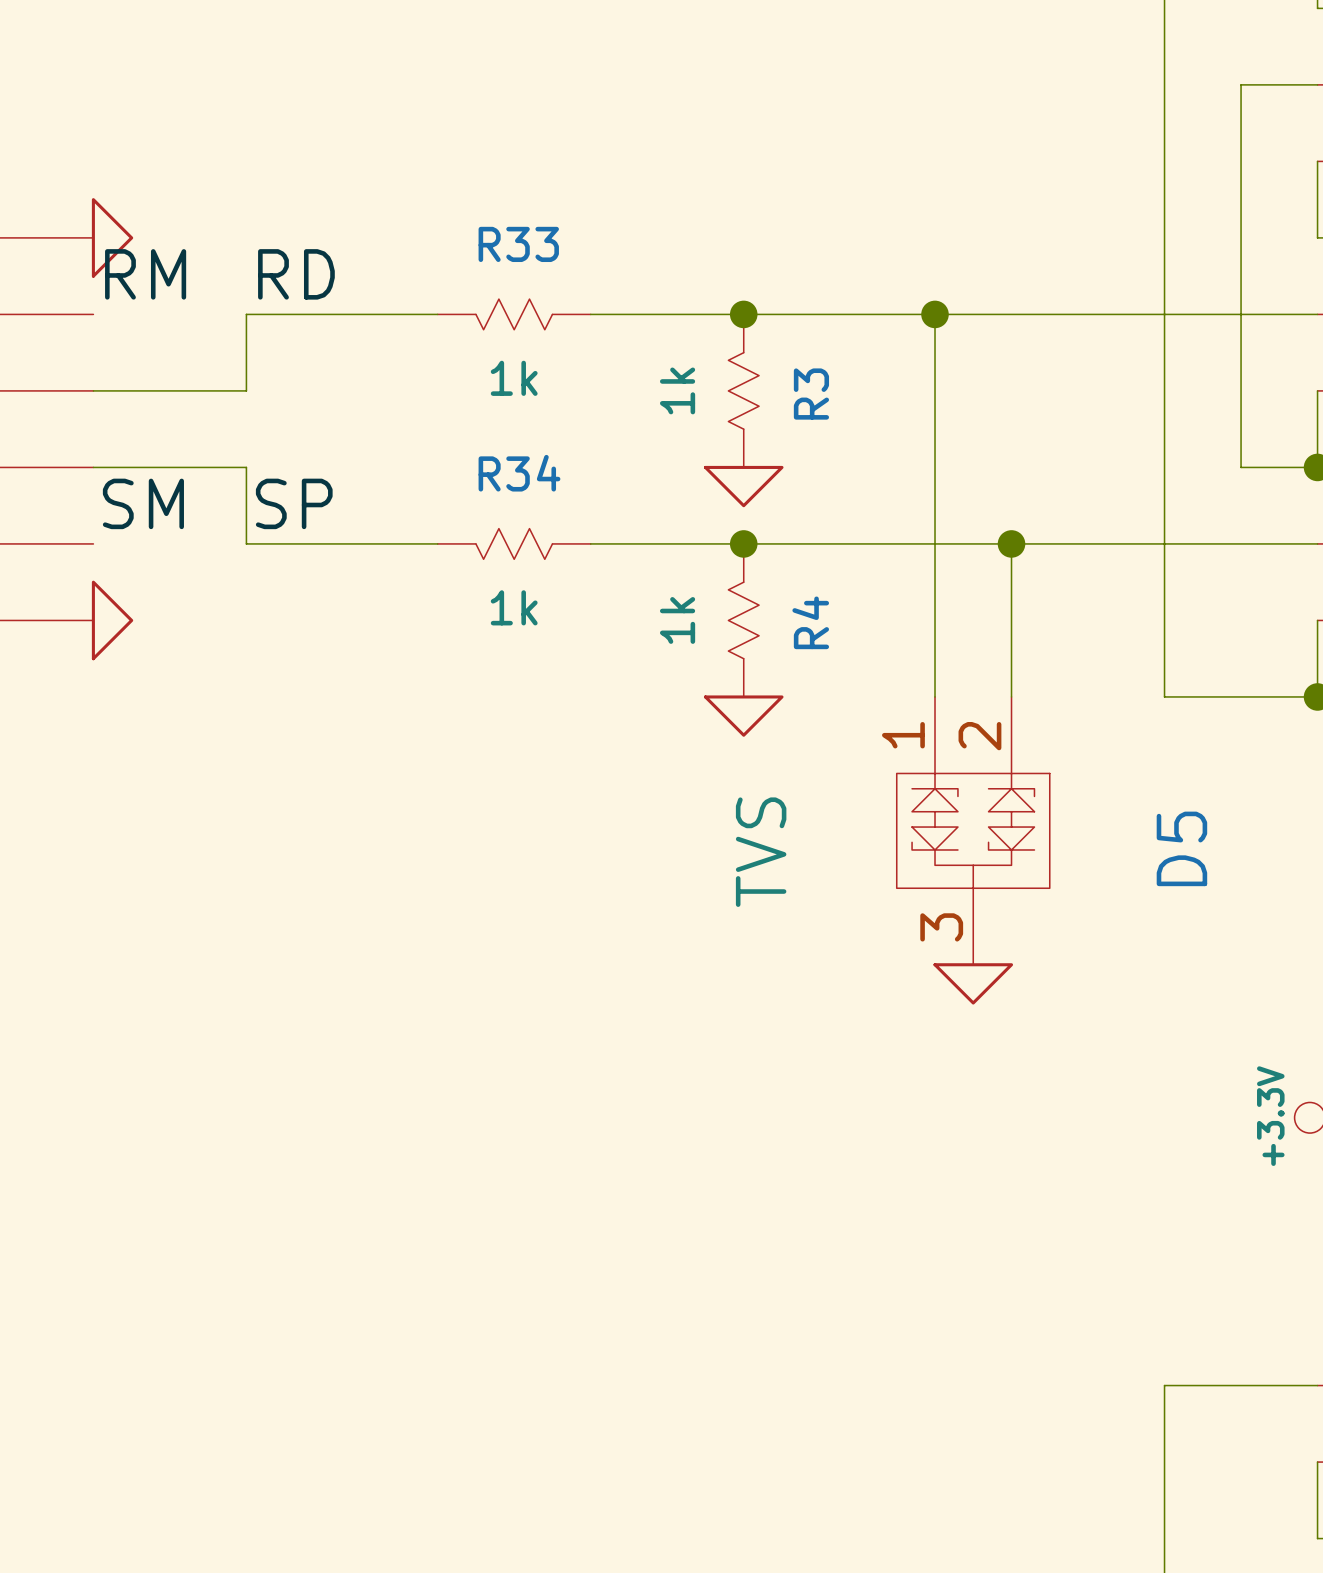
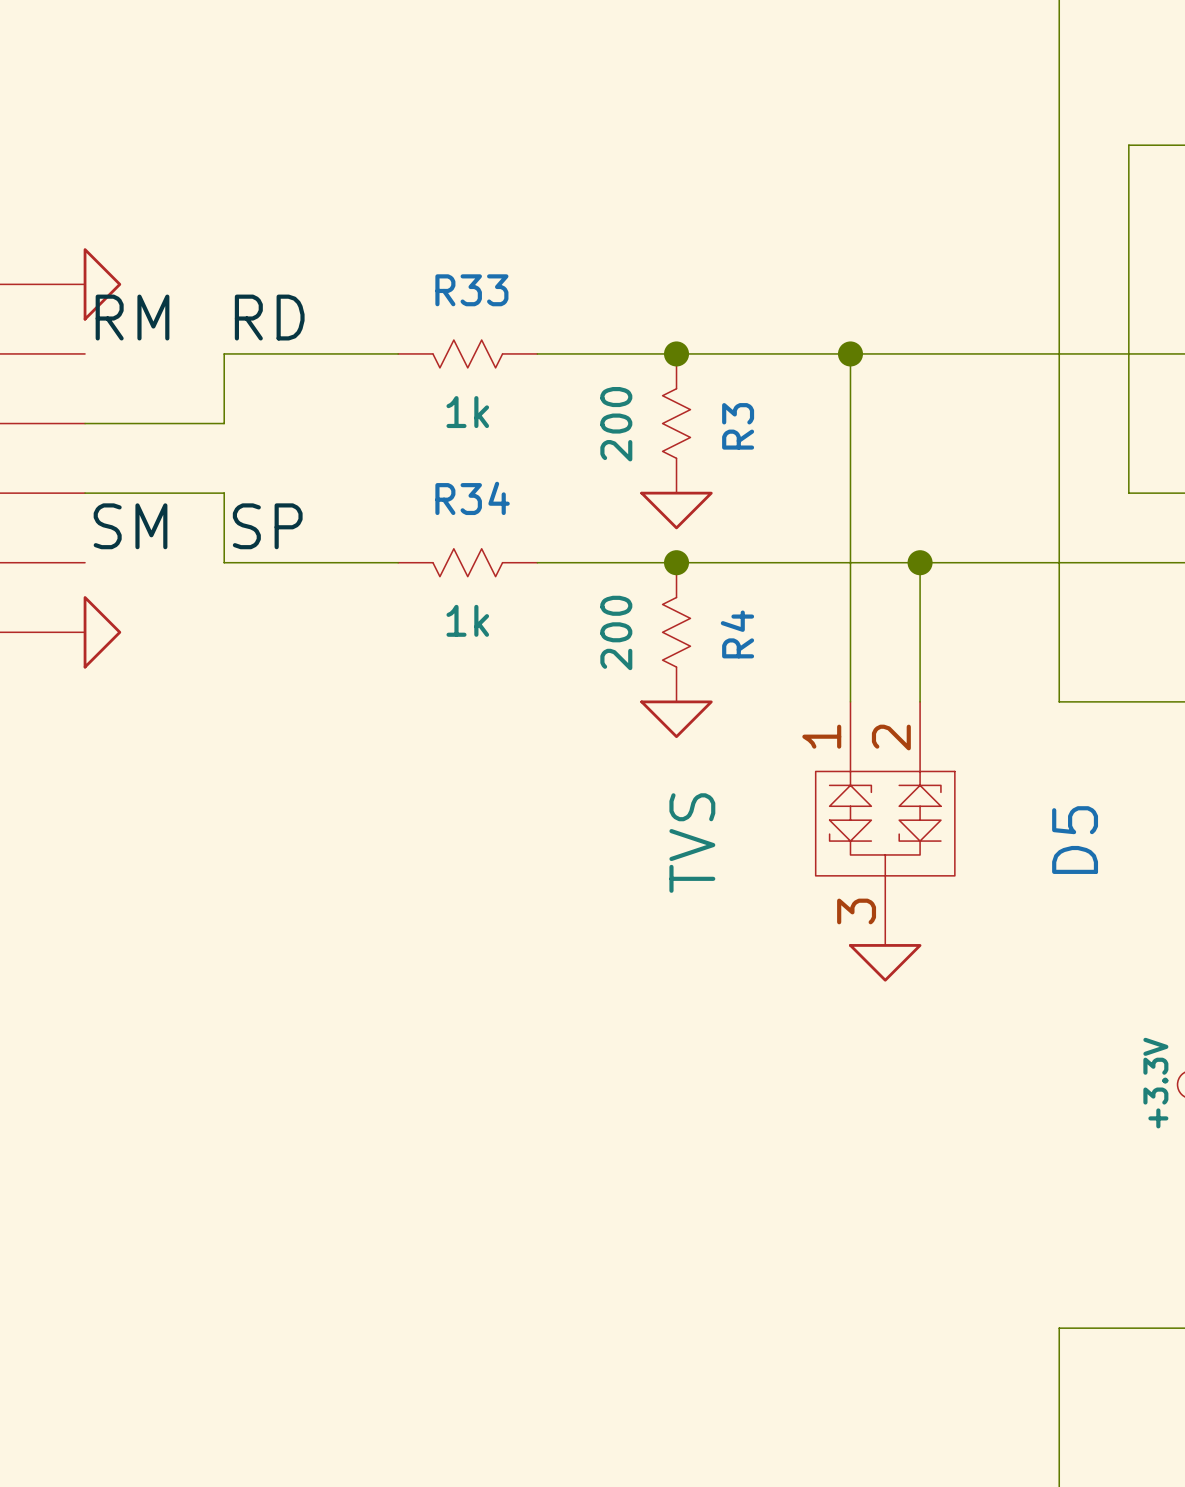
R3 value: 1k (677, 390) -> 200 (616, 424)
R4 value: 1k (677, 620) -> 200 (616, 632)

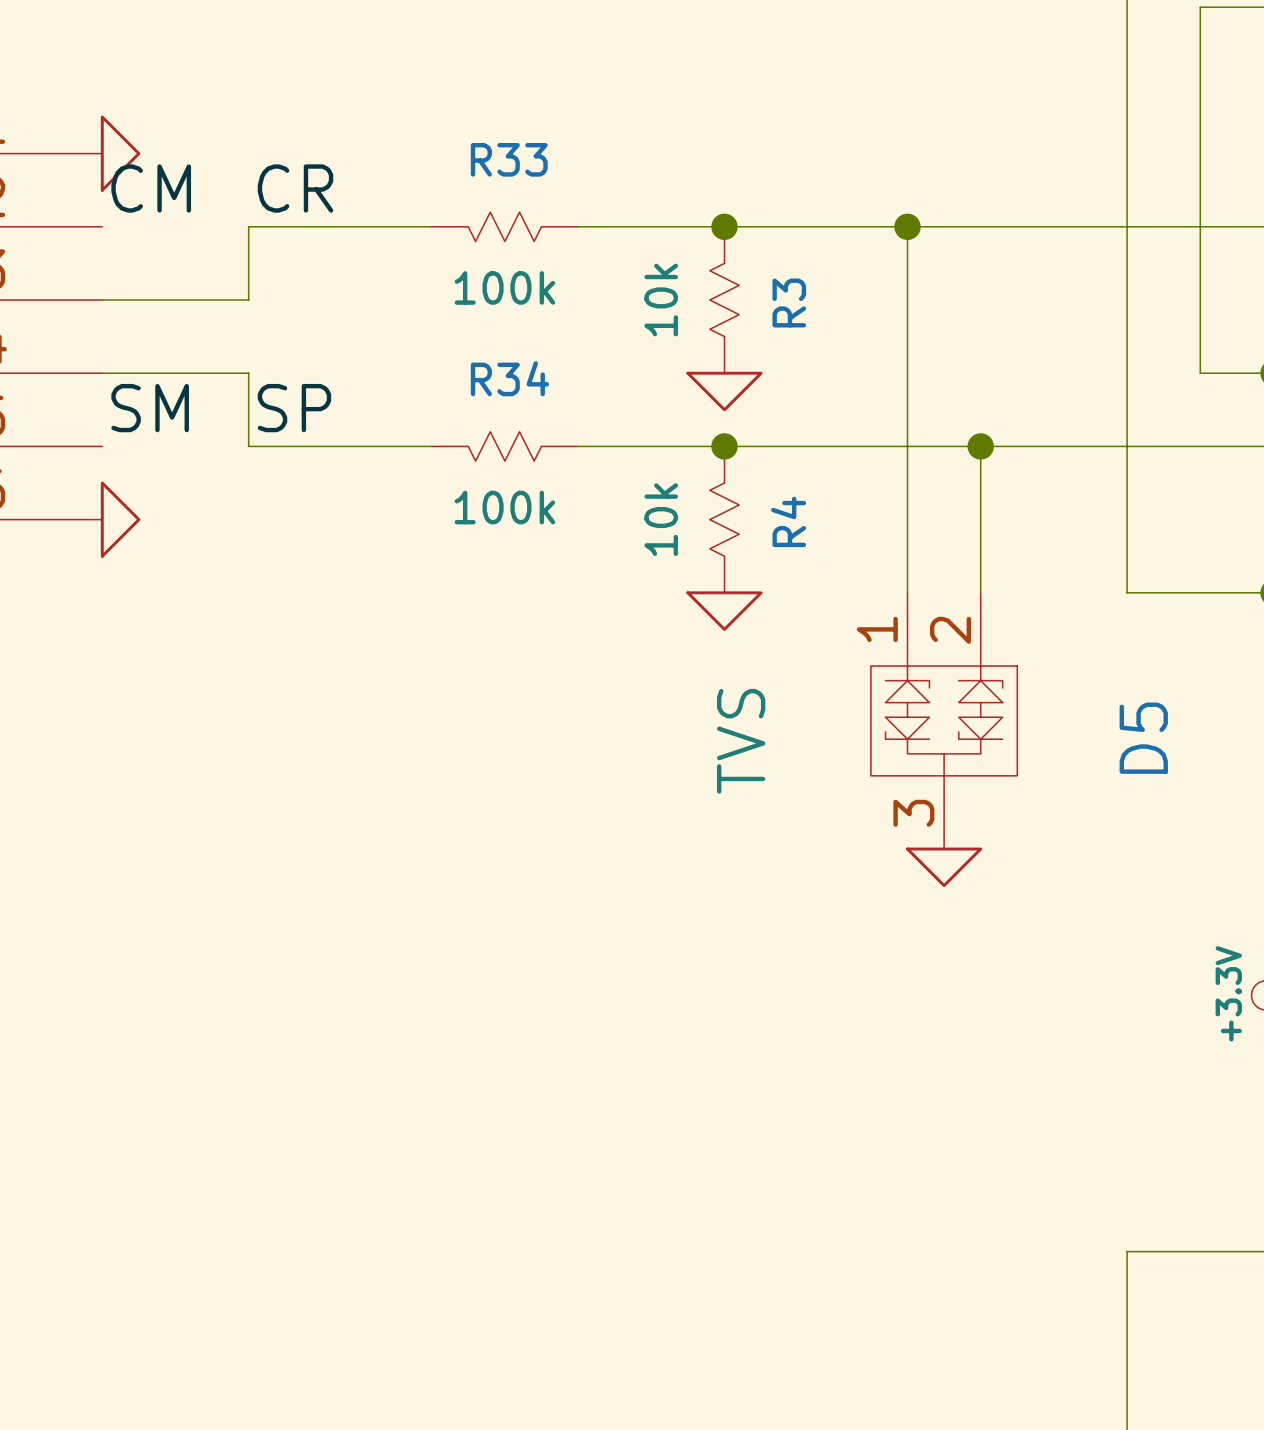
label: RM (132, 317) -> CM (151, 188)
label: RD (269, 317) -> CR (295, 188)
R33 value: 1k (467, 412) -> 100k (504, 287)
R3 value: 200 (616, 424) -> 10k (661, 300)
R34 value: 1k (467, 620) -> 100k (504, 507)
R4 value: 200 (616, 632) -> 10k (661, 519)

